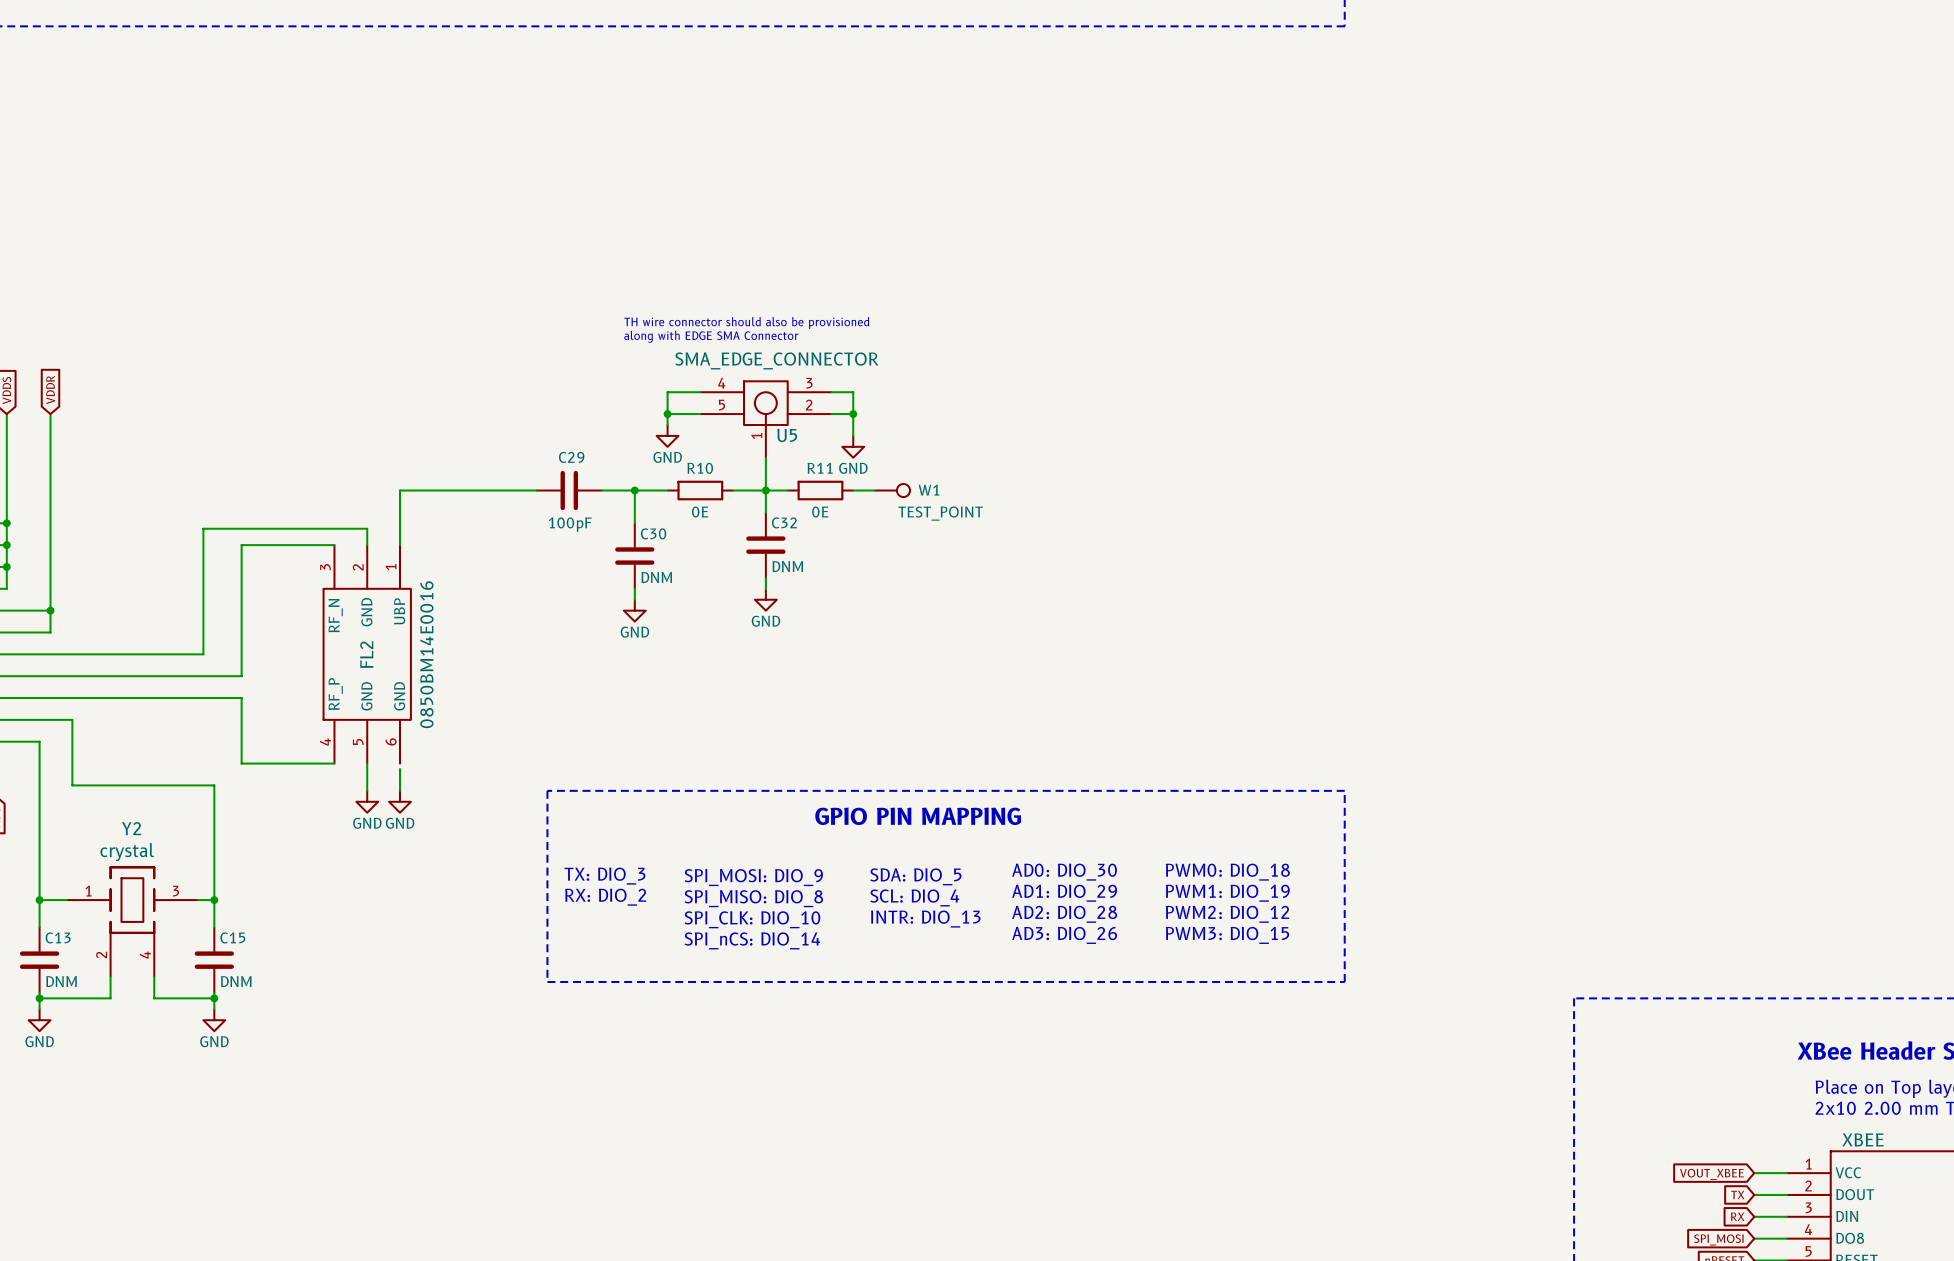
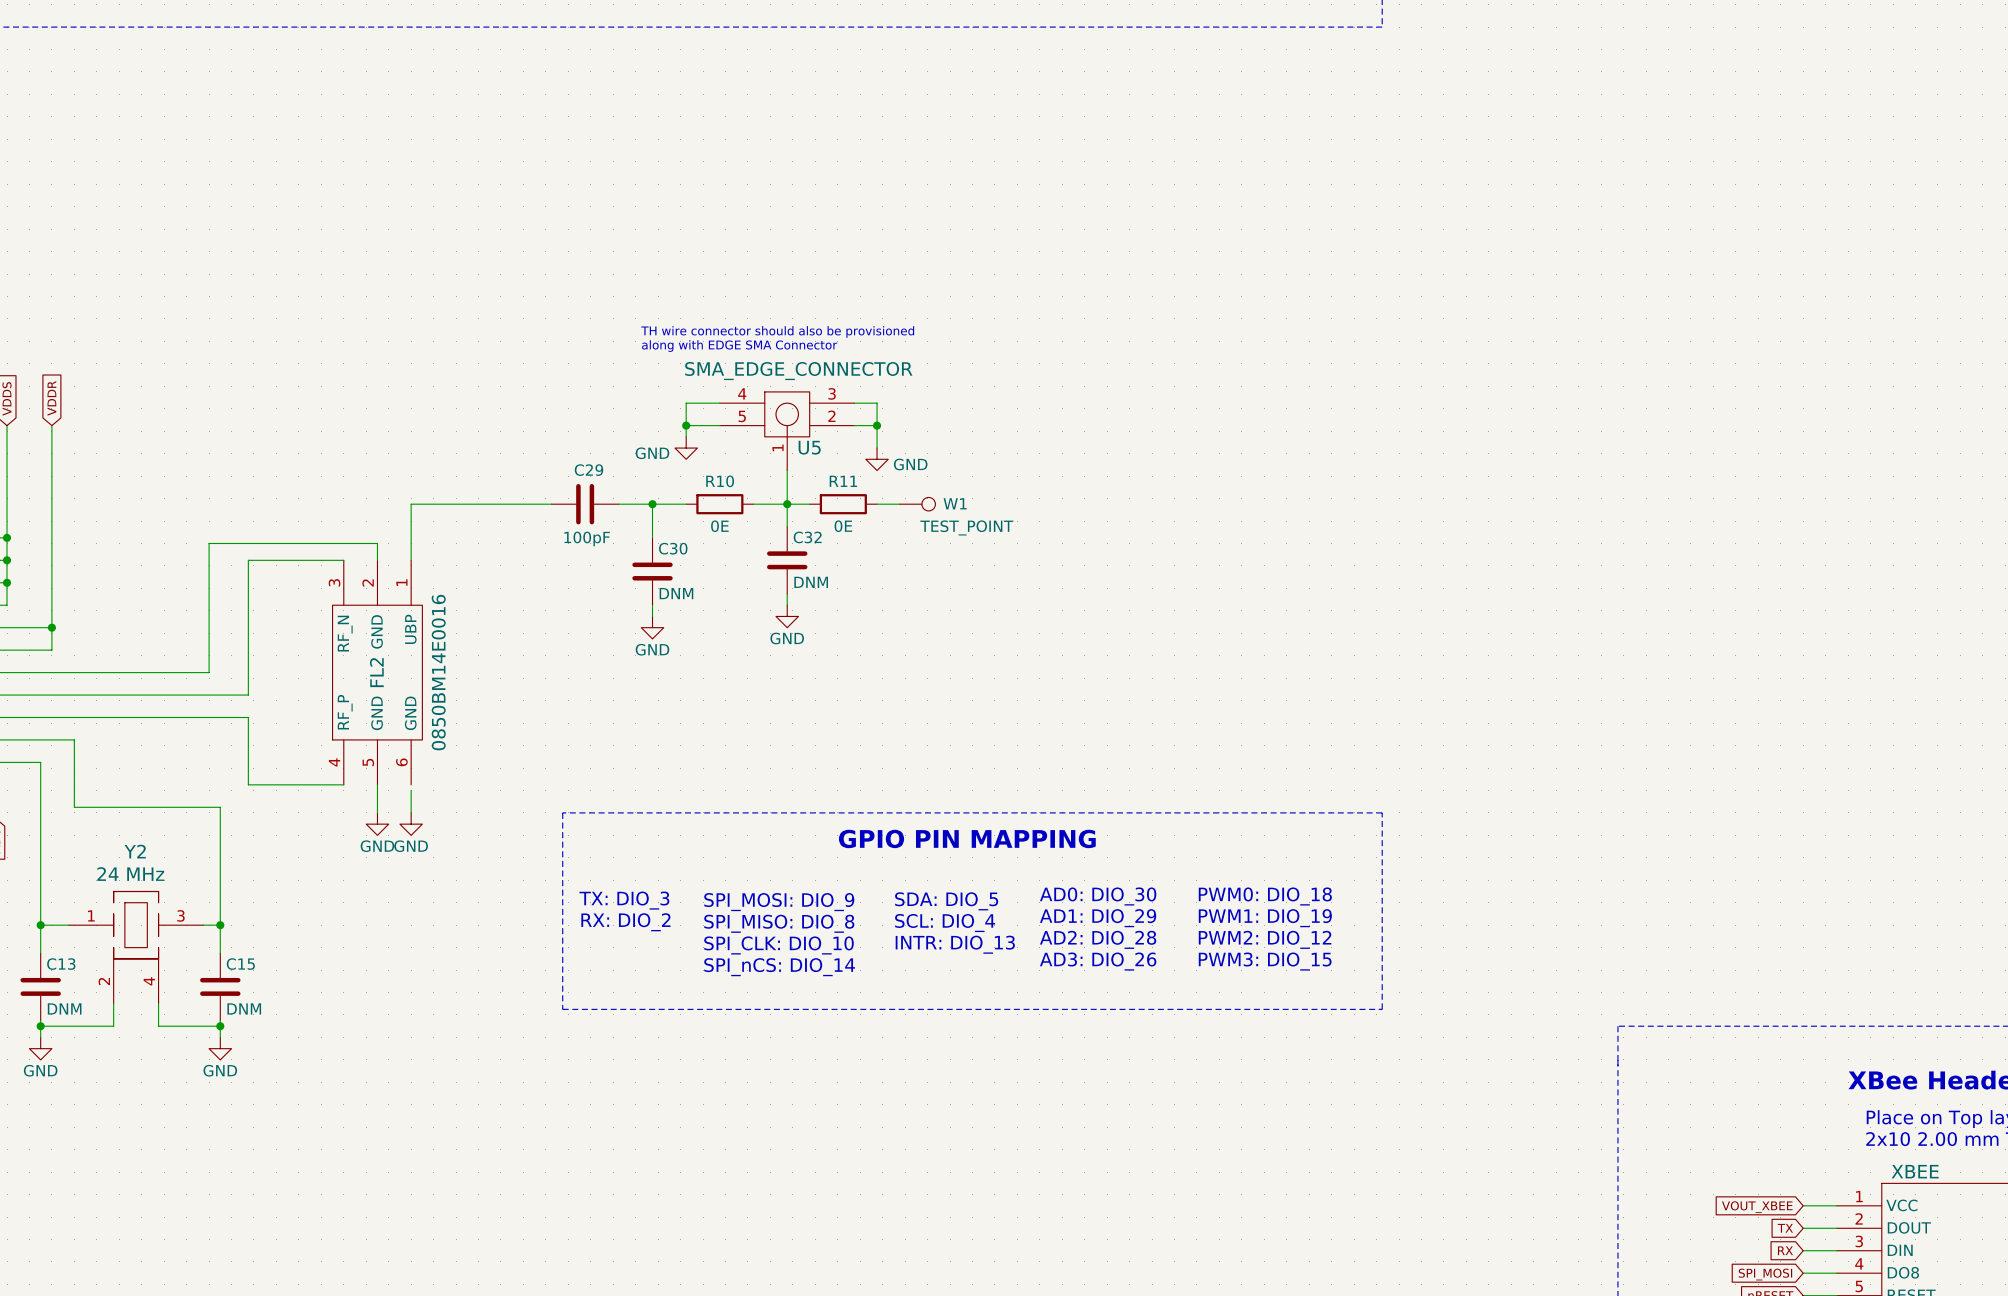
power symbol text position: GND (667, 457) -> GND (652, 453)
power symbol text position: GND (853, 468) -> GND (910, 464)
Y2 value: crystal (127, 852) -> 24 MHz (130, 874)

